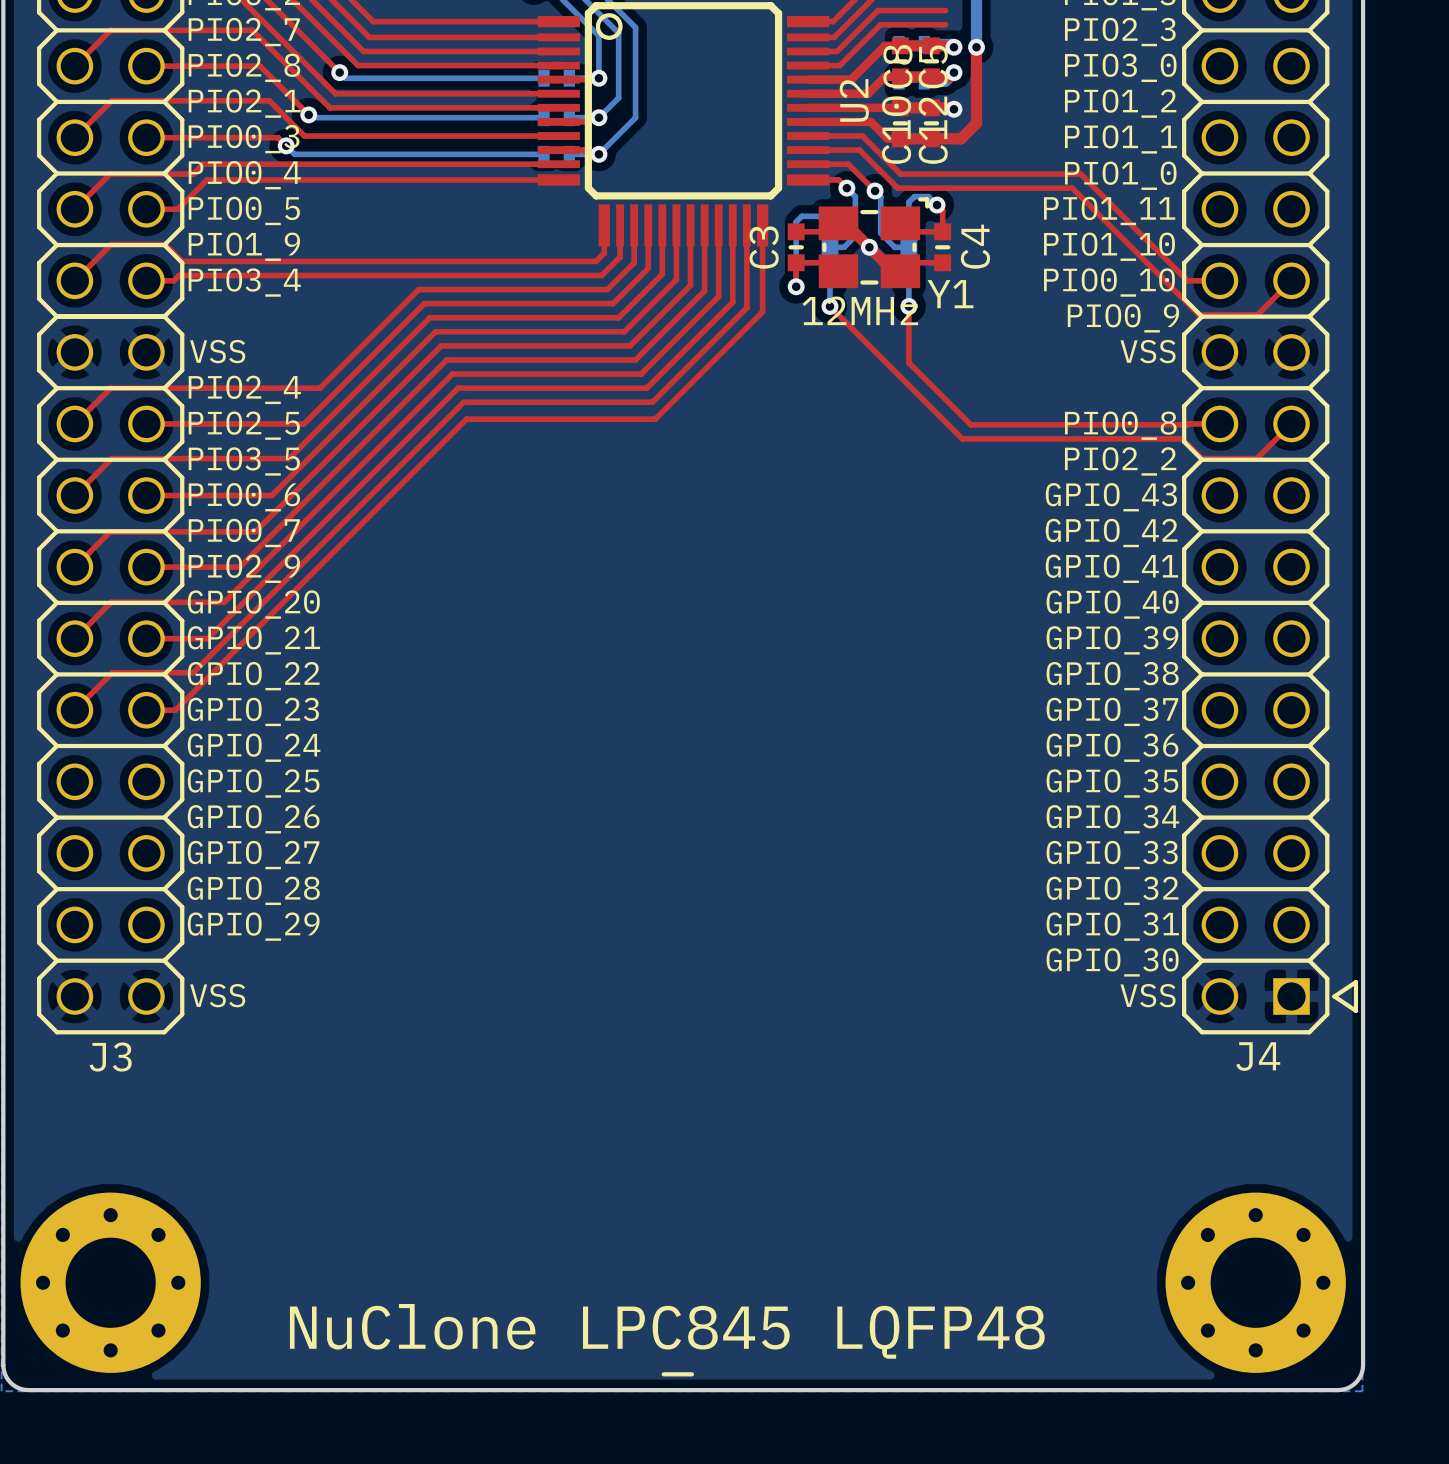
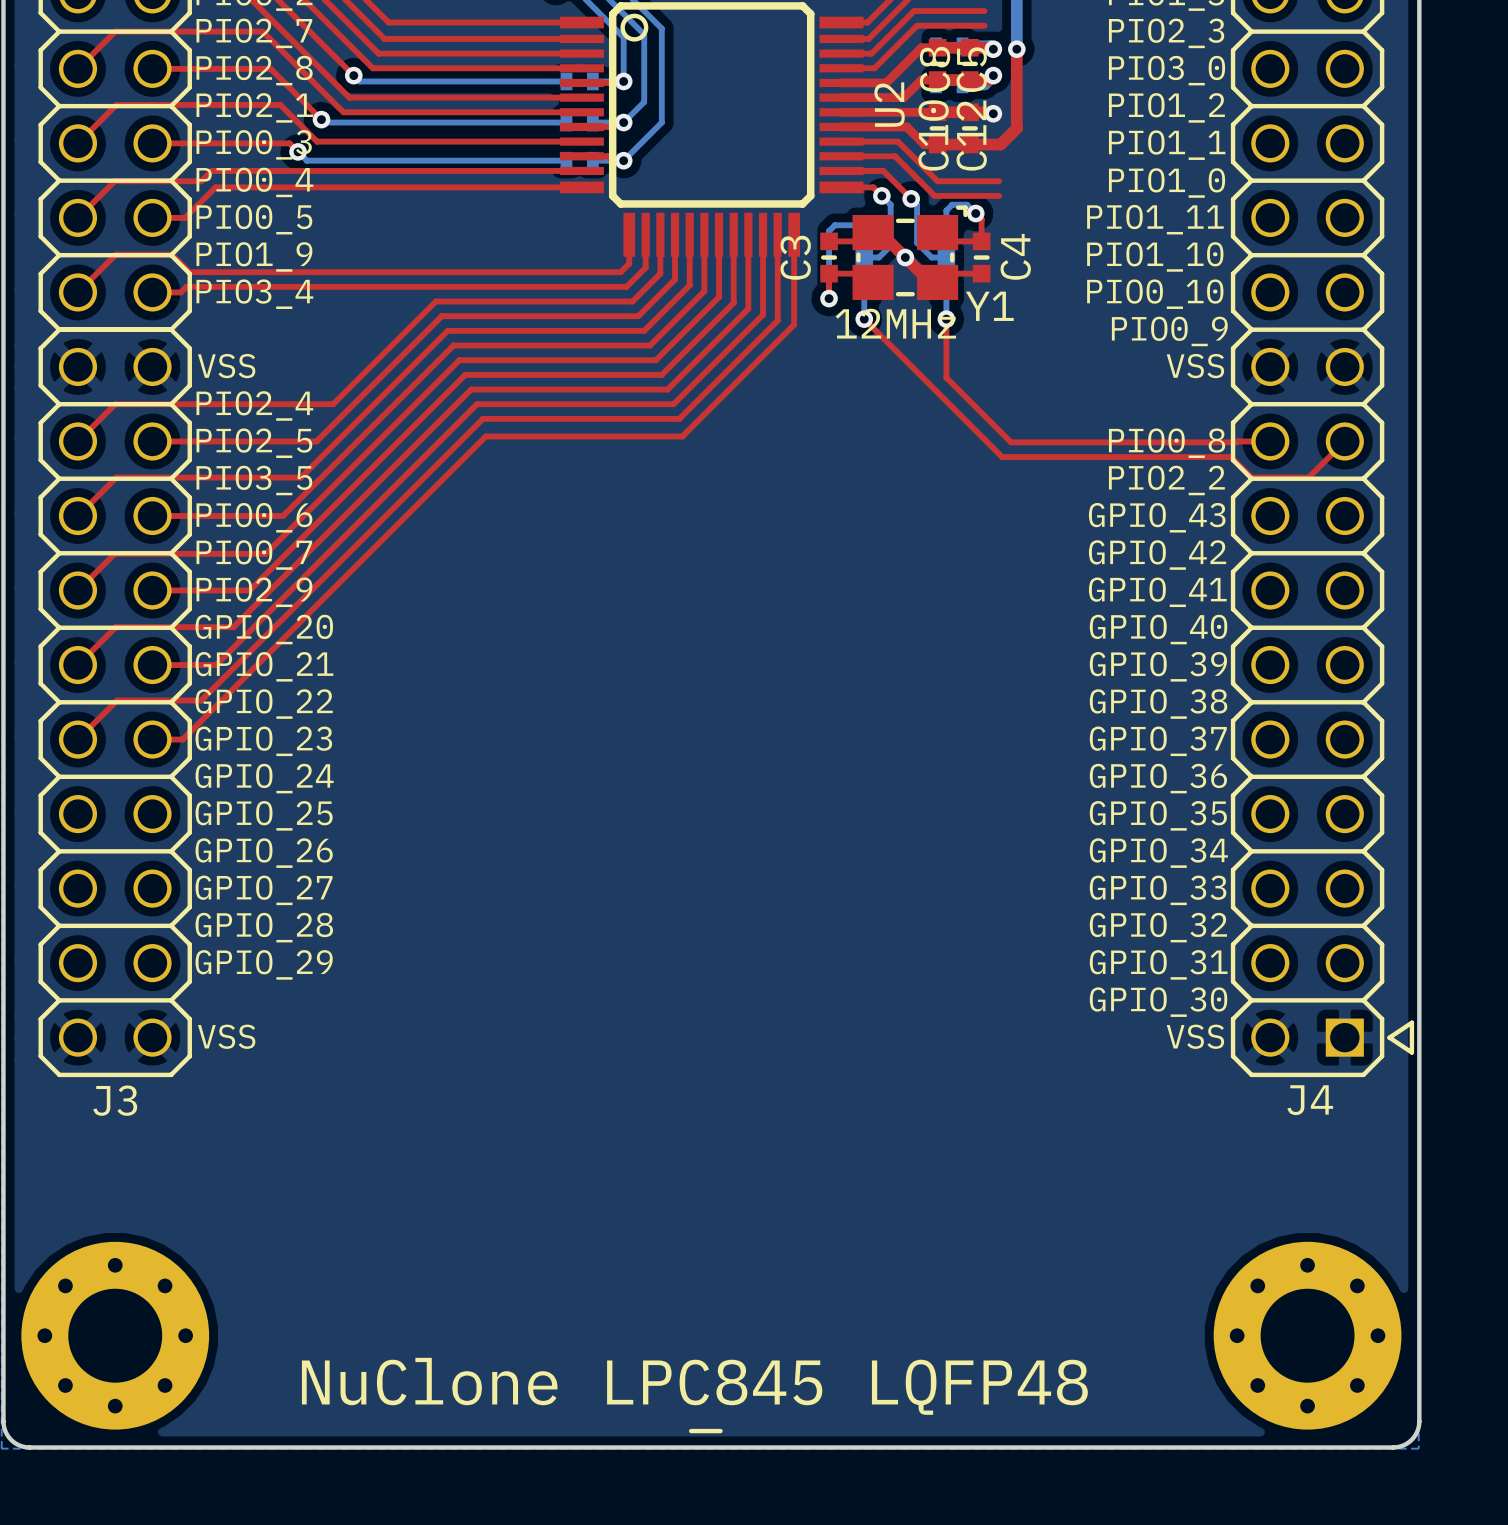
top track: (959, 174) (1080, 174) (1187, 280) (1219, 280) -> none
top track: (959, 188) (1072, 188) (1199, 314) (1257, 314) (1291, 280) -> none

